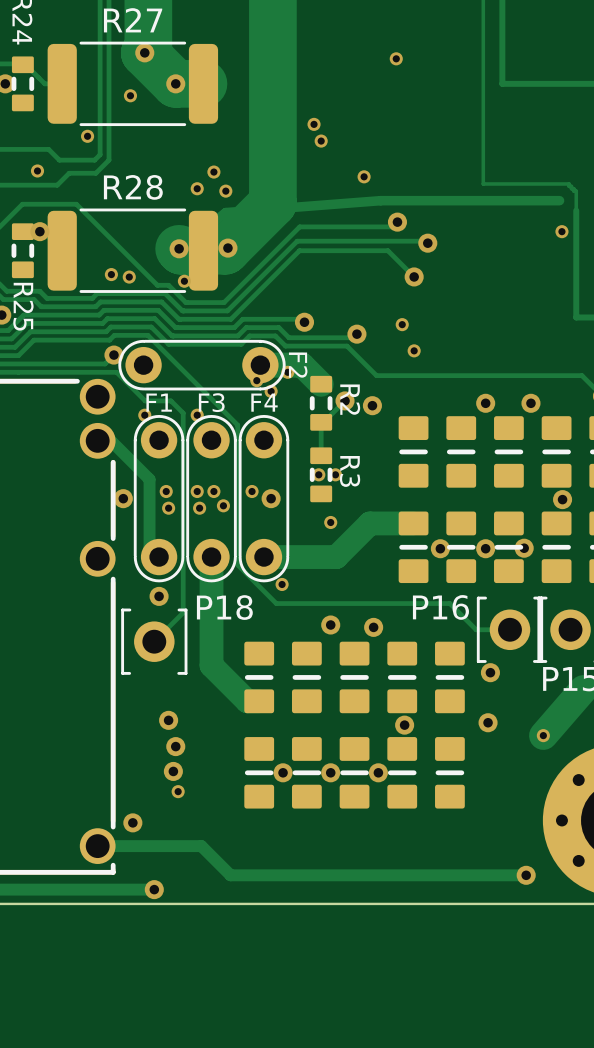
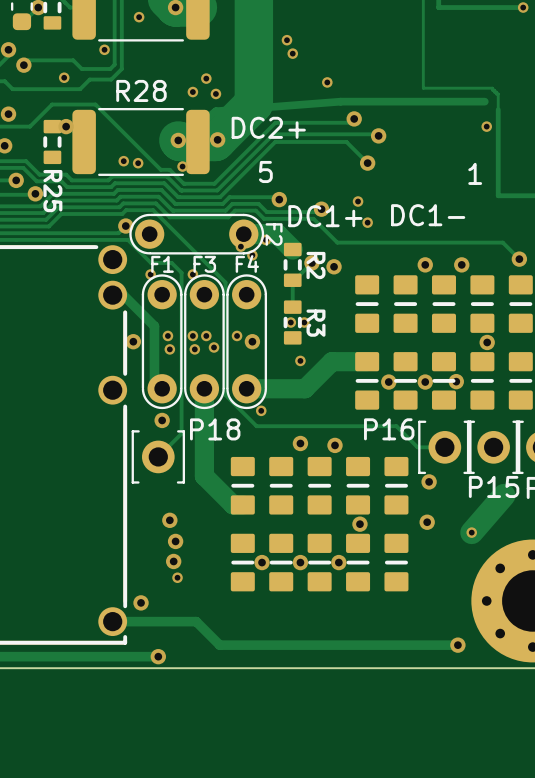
text: none -> DC2+ (268, 127)
text: none -> 5 (265, 171)
text: none -> 1 (475, 173)
text: none -> DC1- (428, 215)
text: none -> DC1+ (325, 216)

